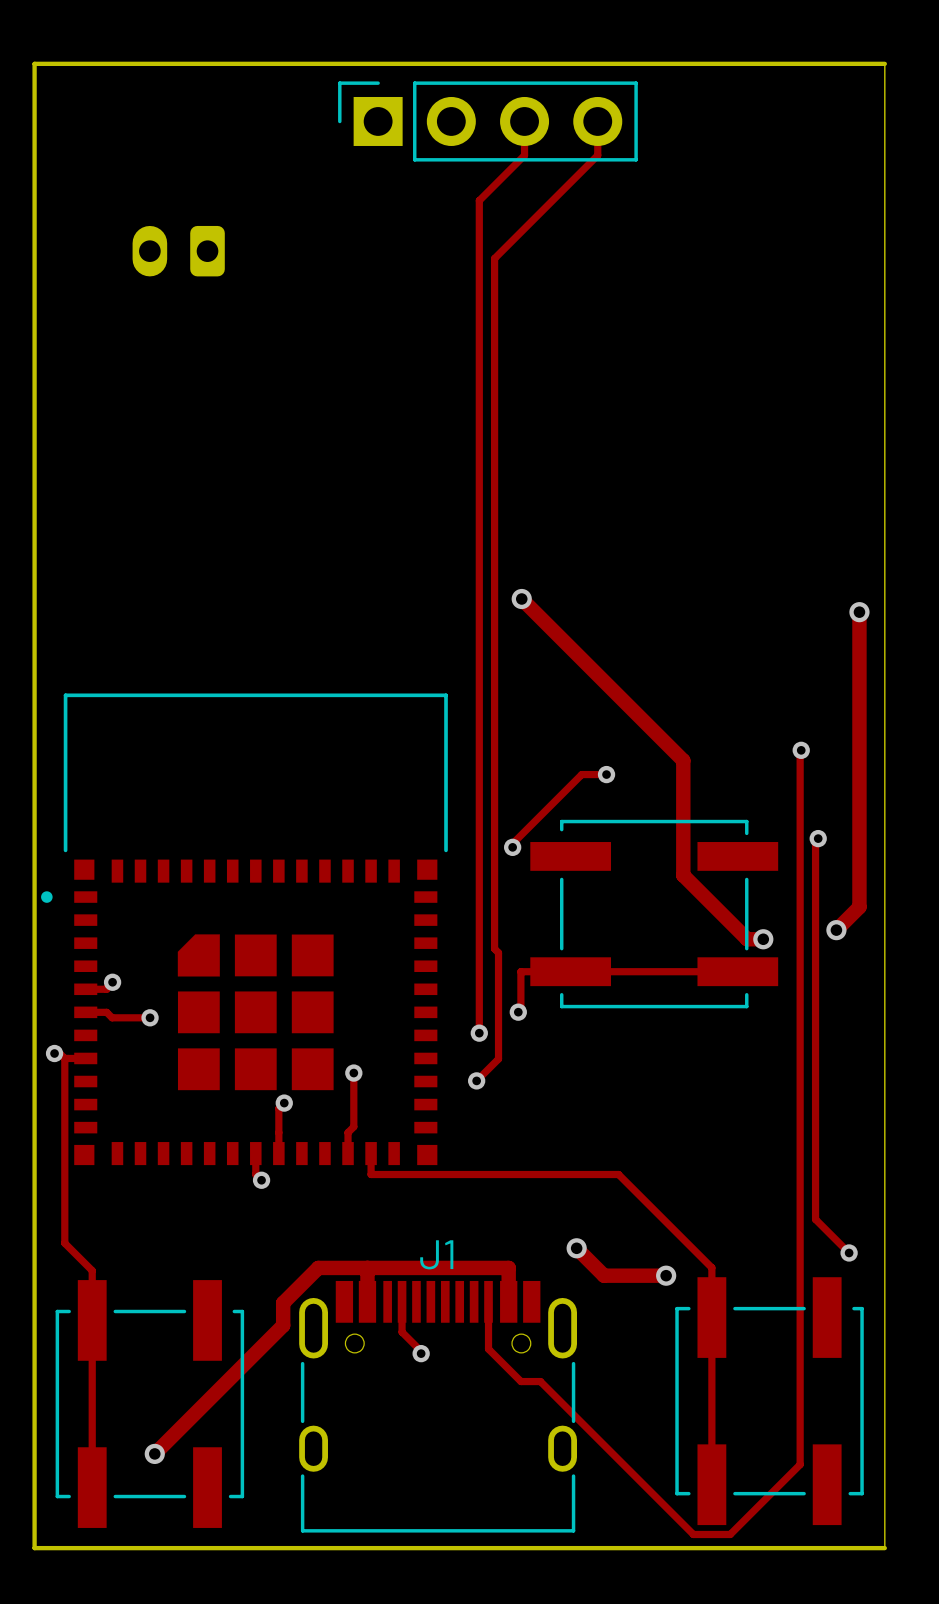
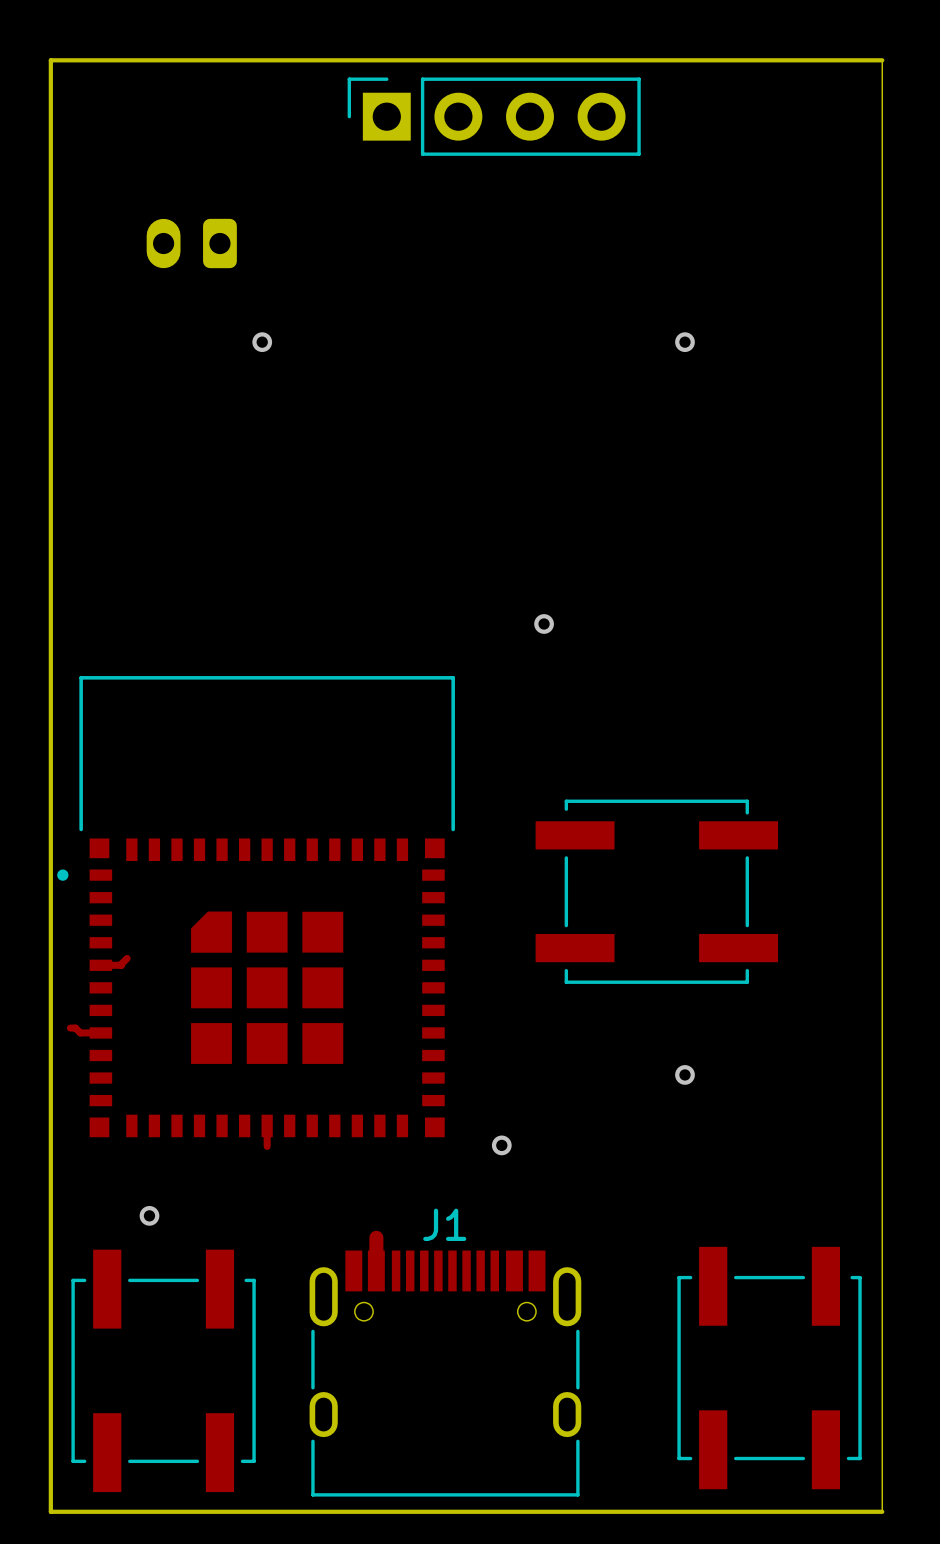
track: (524, 121) (524, 155) (479, 200) (479, 1033) -> none
track: (597, 121) (597, 155) (494, 258) (494, 948) (498, 952) (498, 1059) (476, 1080) -> none
via: none -> (262, 342)
via: none -> (684, 342)
track: (521, 599) (683, 760) (683, 875) (747, 939) (763, 939) -> none
via position: (521, 599) -> (544, 623)
track: (859, 612) (859, 907) (836, 930) -> none
via: (859, 612) -> none
track: (801, 750) (800, 1464) (730, 1534) (693, 1534) (540, 1381) (520, 1381) (488, 1349) (488, 1301) -> none
via: (801, 750) -> none
track: (606, 774) (581, 774) (512, 843) (512, 847) -> none
via: (606, 774) -> none
track: (818, 838) (815, 841) (815, 1219) (849, 1252) -> none
via: (818, 838) -> none
via: (512, 847) -> none
via: (836, 930) -> none
via: (763, 939) -> none
track: (737, 971) (520, 971) (520, 1009) (518, 1012) -> none
via: (112, 982) -> none
track: (85, 1012) (106, 1012) (112, 1017) (150, 1017) -> none
via: (518, 1012) -> none
via: (150, 1017) -> none
via: (479, 1033) -> none
via: (54, 1053) -> none
track: (64, 1058) (64, 1243) (92, 1270) (92, 1487) -> none
track: (353, 1073) (353, 1126) (348, 1132) (348, 1153) -> none
via: (353, 1073) -> none
via: (476, 1080) -> none
via: none -> (684, 1074)
track: (284, 1103) (278, 1108) (278, 1153) -> none
via: (284, 1103) -> none
track: (371, 1153) (371, 1174) (618, 1174) (711, 1267) (711, 1484) -> none
via: none -> (501, 1145)
via: (261, 1180) -> none
via: none -> (149, 1215)
track: (576, 1248) (604, 1275) (666, 1275) -> none
via: (576, 1248) -> none
via: (849, 1252) -> none
via: (666, 1275) -> none
track: (402, 1301) (402, 1332) (421, 1351) (421, 1353) -> none
track: (508, 1301) (508, 1267) (318, 1267) (283, 1303) (283, 1325) (154, 1453) -> none
via: (421, 1353) -> none
via: (154, 1453) -> none

